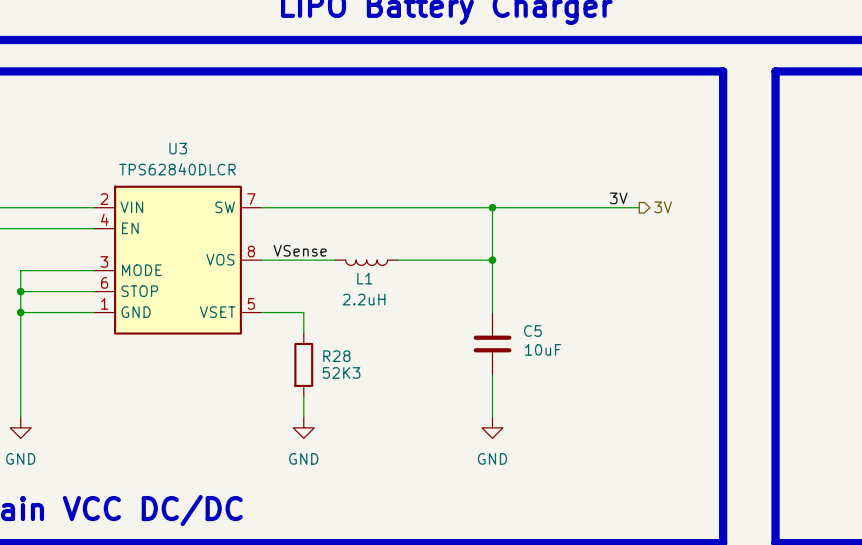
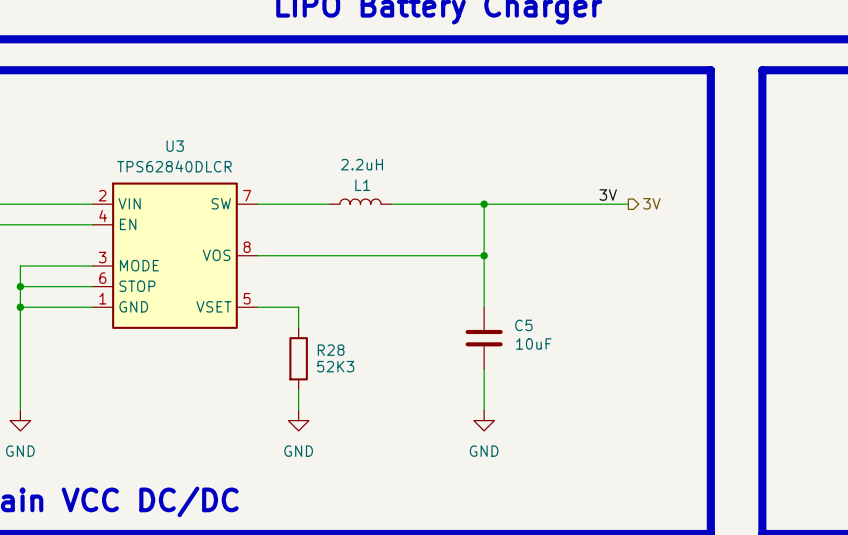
wire: (335, 207) (398, 207) -> (329, 255) (391, 255)
label: VSense (300, 250) -> none
L1 rotation: 0° (366, 262) -> 180° (360, 201)
L1 position: (366, 262) -> (360, 201)

